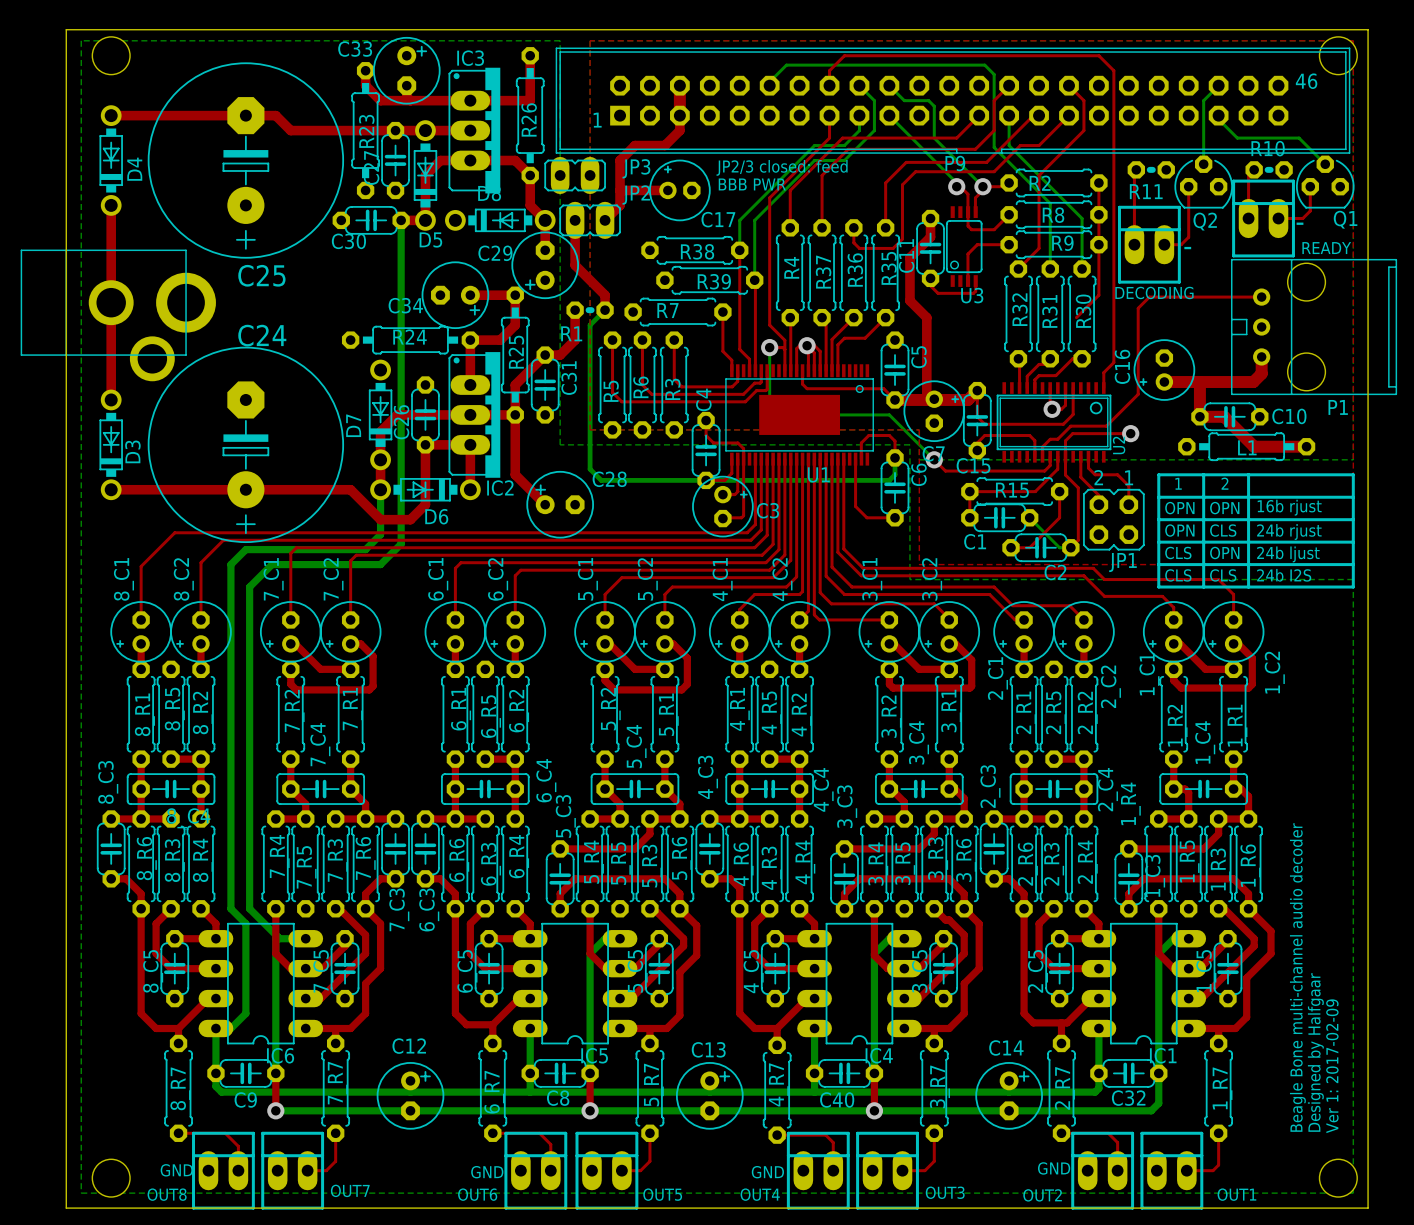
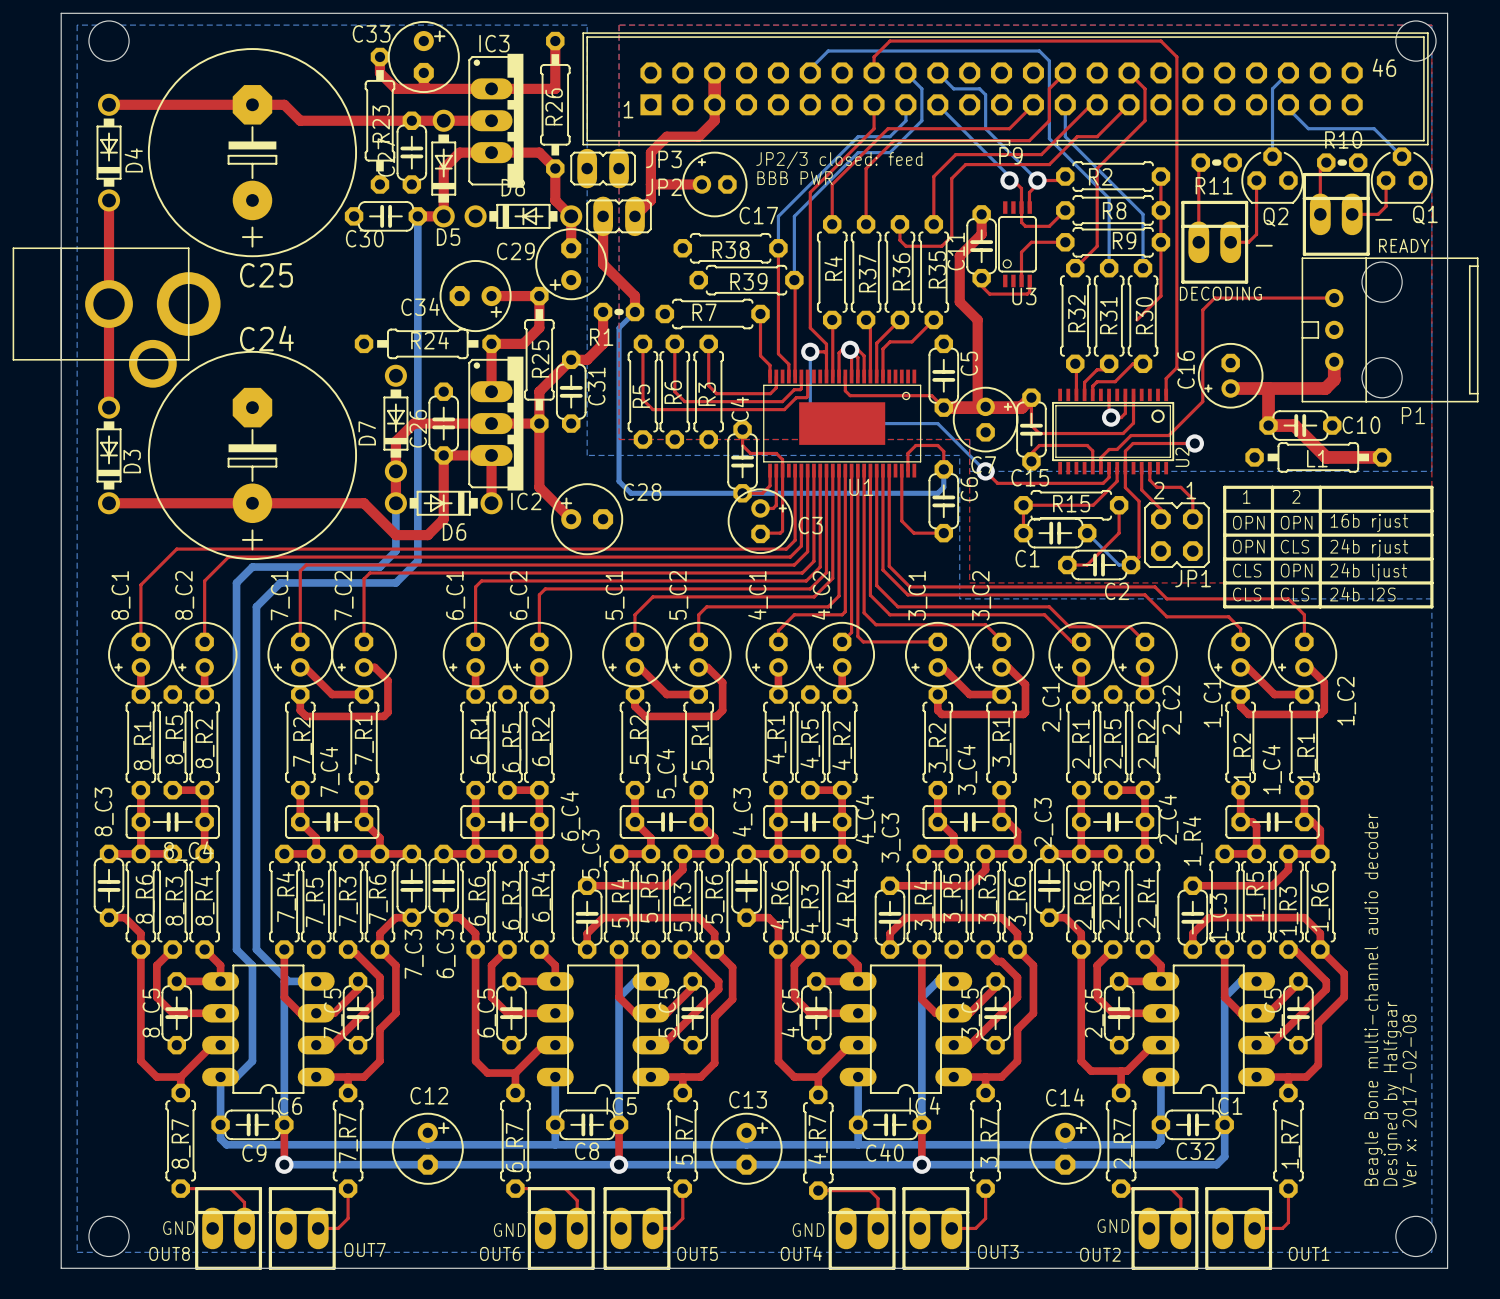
text: Ver 1: 2017-02-09 (1332, 1066) -> Ver x: 2017-02-08 (1409, 1101)

